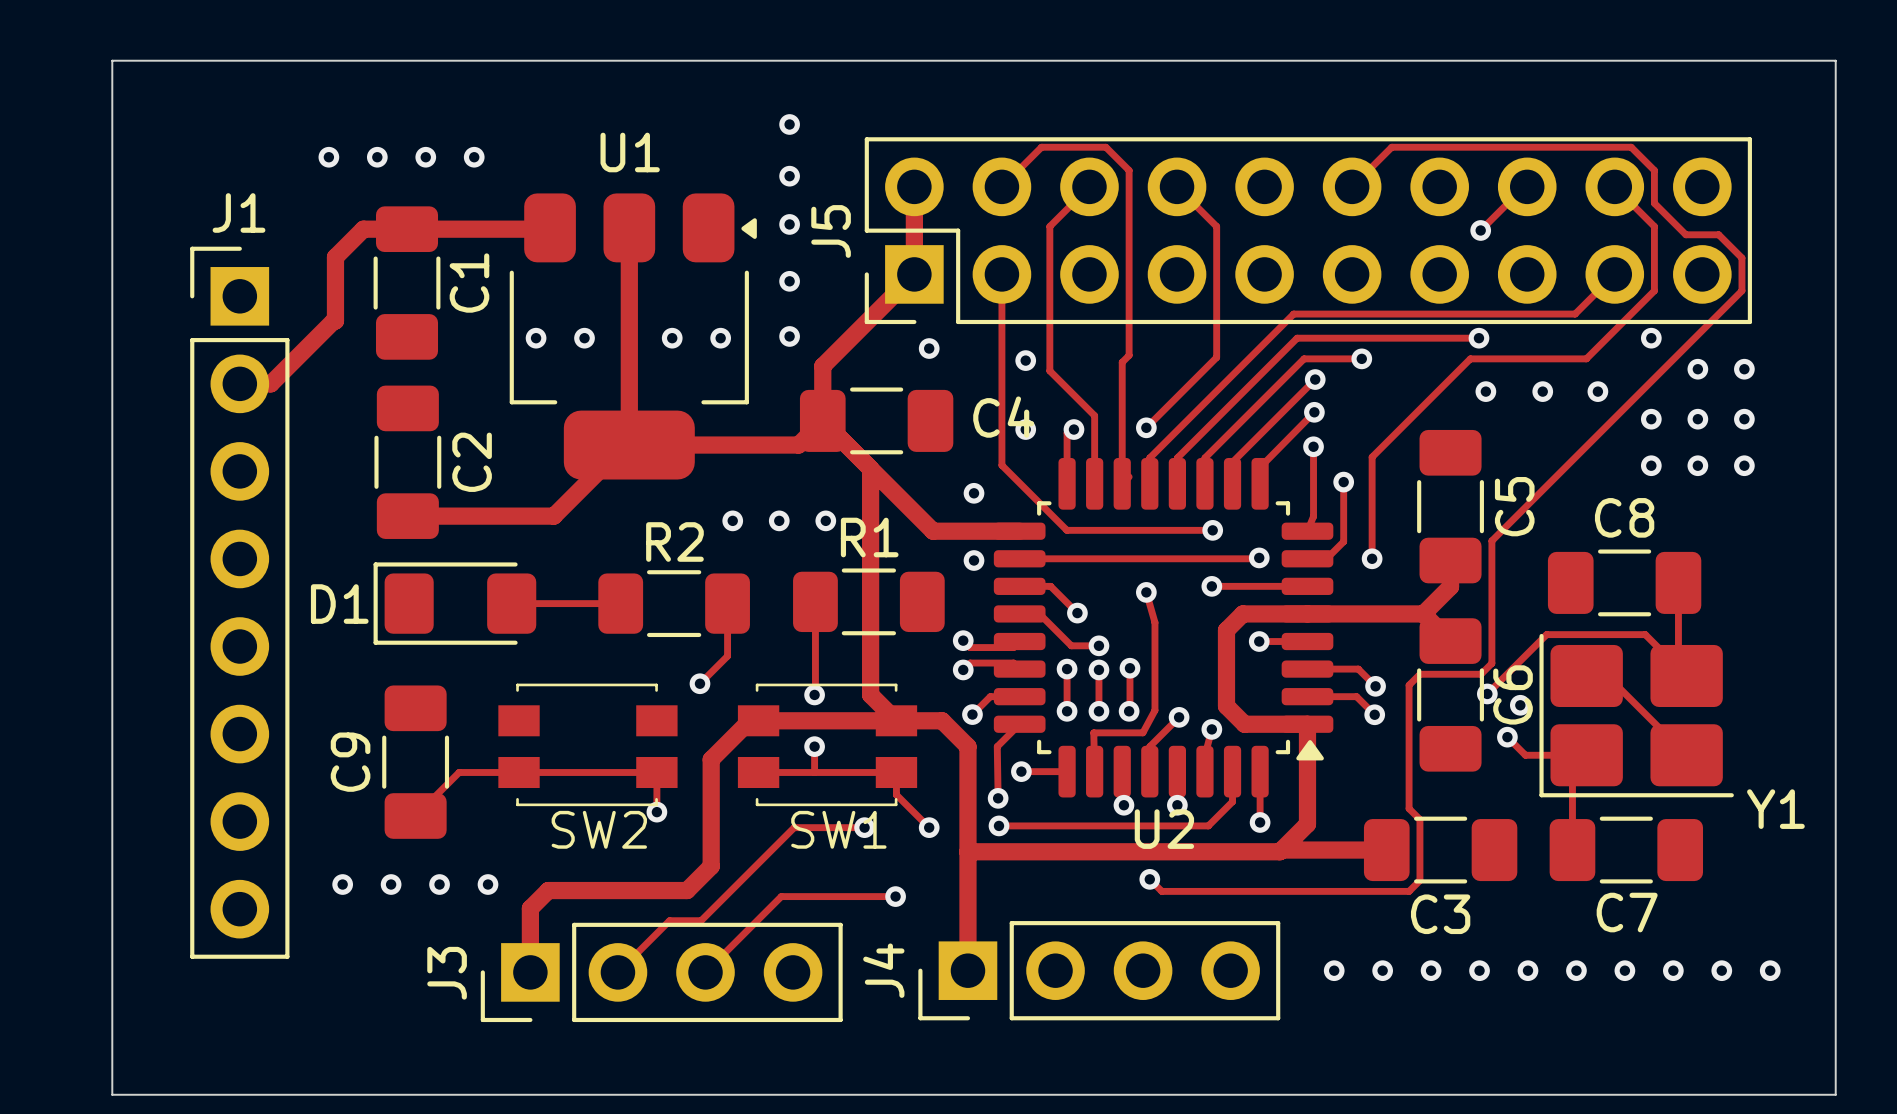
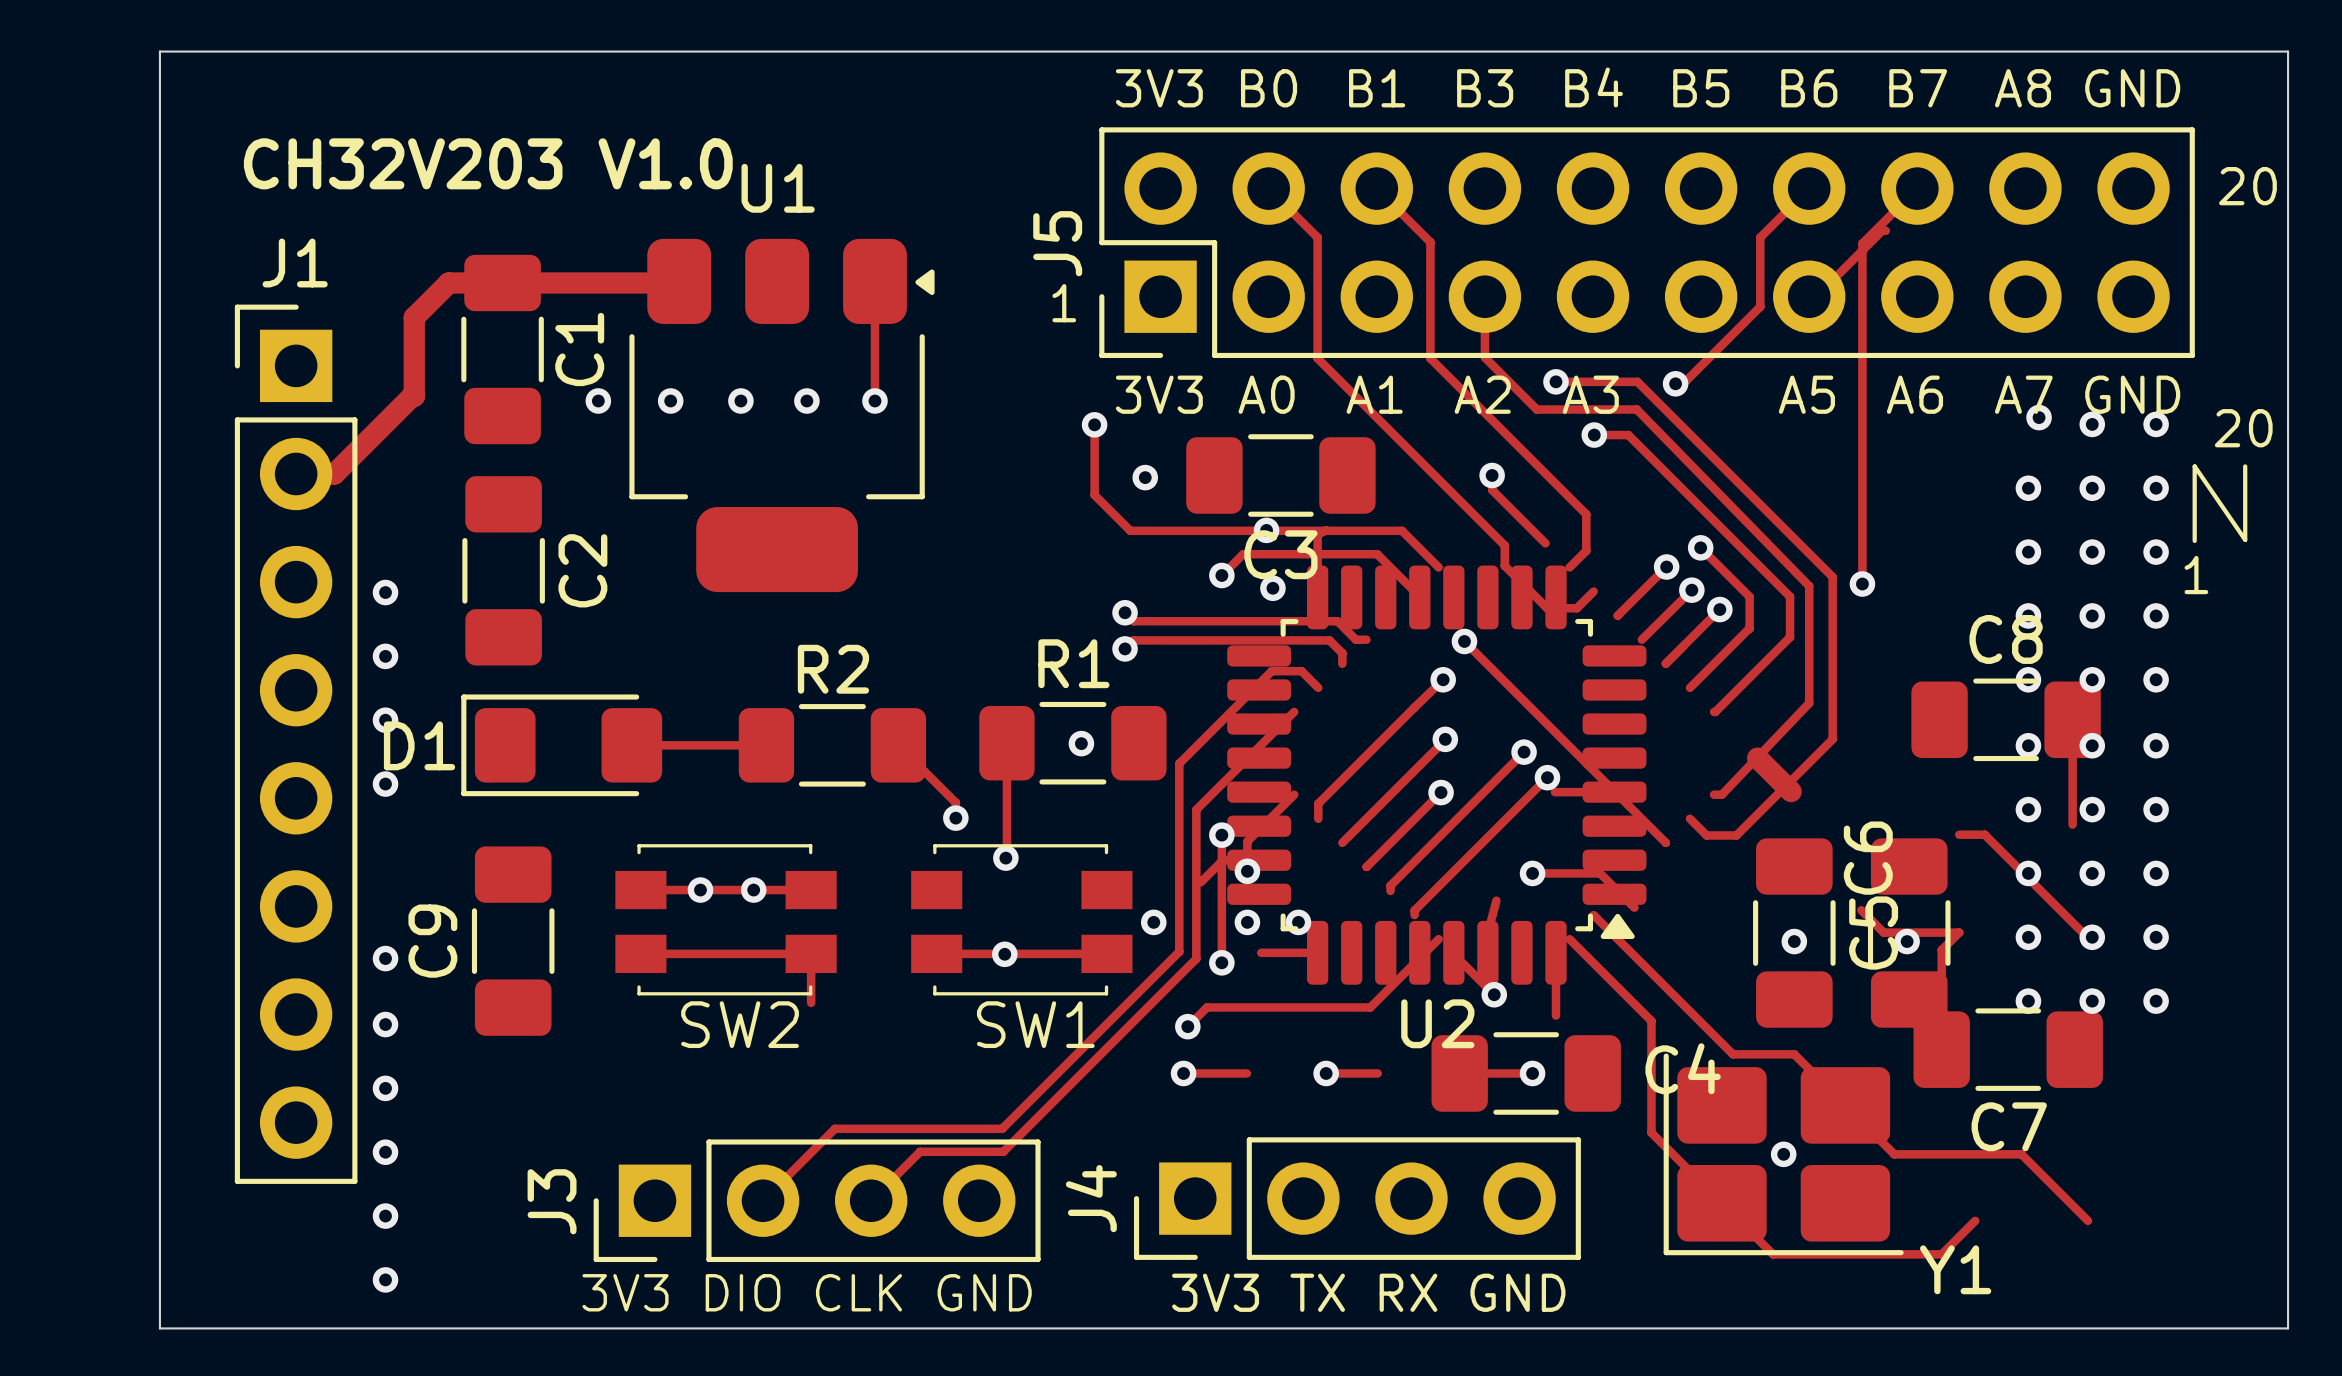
board edge: (112, 60) (1835, 60) (1835, 1094) (112, 1094) (112, 60) -> (159, 51) (2288, 51) (2288, 1328) (159, 1328) (159, 51)
text: none -> B4 (1594, 87)
text: none -> 3V3 (1159, 88)
text: none -> B0 (1269, 88)
text: none -> B1 (1377, 88)
text: none -> B3 (1485, 88)
text: none -> B5 (1701, 88)
text: none -> B6 (1809, 88)
text: none -> B7 (1918, 88)
text: none -> A8 (2023, 88)
text: none -> GND (2132, 88)
via: (789, 124) -> none
text: none -> CH32V203 V1.0 (488, 163)
text: none -> 20 (2247, 186)
track: none -> (1268, 188) (1317, 237) (1317, 358) (1504, 545) (1504, 565) (1547, 608) (1576, 608) (1593, 591)
track: none -> (1376, 188) (1430, 242) (1430, 358) (1586, 514) (1586, 550) (1569, 567)
track: none -> (1809, 188) (1760, 237) (1760, 306) (1683, 383) (1675, 383)
track: none -> (1917, 188) (1862, 243) (1862, 584)
via: (328, 157) -> none
via: (377, 157) -> none
via: (425, 157) -> none
via: (474, 157) -> none
via: (789, 176) -> none
track: (914, 186) (914, 274) (822, 366) (822, 420) -> none
track: (1001, 186) (1041, 147) (1105, 147) (1129, 170) (1129, 355) (1122, 362) (1122, 483) (1129, 476) -> none
track: (1089, 186) (1049, 226) (1049, 370) (1094, 415) (1094, 483) -> none
track: (1177, 186) (1216, 226) (1216, 357) (1146, 427) -> none
track: (1352, 186) (1391, 147) (1631, 147) (1654, 170) (1654, 203) (1685, 234) (1718, 234) (1741, 258) (1741, 290) (1491, 540) (1491, 663) (1481, 674) (1420, 674) (1409, 685) (1409, 808) (1419, 819) (1419, 880) (1409, 891) (1161, 891) (1149, 879) -> none
track: (1614, 186) (1654, 226) (1654, 290) (1586, 358) (1470, 358) (1372, 457) (1372, 558) -> none
via: (789, 224) -> none
track: (629, 227) (629, 445) -> none
track: none -> (874, 281) (874, 401)
J5 position: (1308, 230) -> (1647, 242)
via: (1480, 230) -> none
track: none -> (1484, 296) (1484, 357) (1536, 409) (1636, 409) (1809, 586) (1809, 703) (1721, 794) (1714, 794)
text: none -> 1 (1064, 303)
track: (1001, 274) (1001, 465) (1066, 530) (1212, 530) -> none
track: (1614, 274) (1575, 314) (1293, 314) (1149, 457) (1149, 483) -> none
via: (789, 281) -> none
track: none -> (1555, 381) (1637, 381) (1832, 576) (1832, 739) (1736, 835) (1706, 835) (1689, 818)
via: none -> (1555, 381)
via: none -> (1675, 383)
text: none -> 3V3 (1159, 394)
text: none -> A0 (1266, 394)
text: none -> A1 (1374, 394)
text: none -> A2 (1482, 394)
text: none -> A3 (1590, 394)
text: none -> A5 (1806, 394)
text: none -> A6 (1914, 394)
text: none -> A7 (2023, 394)
text: none -> GND (2132, 394)
via: none -> (598, 401)
via: (789, 336) -> none
via position: (536, 338) -> (670, 401)
via position: (584, 338) -> (740, 401)
via position: (672, 338) -> (806, 401)
via position: (720, 338) -> (874, 401)
track: (1478, 338) (1297, 338) (1177, 457) (1177, 483) -> none
via: (1478, 338) -> none
via: none -> (2092, 424)
via: none -> (2156, 424)
track: none -> (1094, 424) (1094, 495) (1130, 530) (1402, 530) (1438, 567)
via: none -> (1094, 424)
text: none -> 20 (2243, 428)
via: (929, 348) -> none
track: none -> (1594, 435) (1628, 435) (1790, 596) (1790, 637) (1714, 711)
via: none -> (1594, 435)
track: (1361, 358) (1304, 358) (1204, 457) (1204, 483) -> none
via: (1361, 358) -> none
via: (1025, 360) -> none
via: (1697, 369) -> none
via: (1744, 369) -> none
line: none -> (2245, 466) (2245, 539) (2194, 466) (2194, 540)
track: (1315, 379) (1232, 462) (1232, 483) -> none
via: (1315, 379) -> none
track: none -> (1492, 475) (1492, 490) (1545, 543)
via: none -> (1492, 475)
via: none -> (1145, 477)
via: (1485, 391) -> none
via: (1542, 391) -> none
via: (1597, 391) -> none
via: none -> (2028, 488)
via: none -> (2092, 488)
via: none -> (2156, 488)
track: (1314, 412) (1260, 467) (1260, 483) -> none
via: (1314, 412) -> none
via: (1651, 419) -> none
via: (1697, 419) -> none
via: (1744, 419) -> none
track: (822, 420) (933, 531) (1019, 531) -> none
track: (822, 420) (798, 445) (625, 445) (553, 516) (407, 516) -> none
C4 position: (876, 420) -> (1526, 1073)
via: (1146, 427) -> none
via: (1073, 429) -> none
track: none -> (1700, 547) (1749, 596) (1749, 628)
via: none -> (1700, 547)
track: (1313, 446) (1313, 516) (1307, 531) -> none
via: (1313, 446) -> none
track: none -> (1666, 566) (1617, 615)
via: none -> (1666, 566)
via position: (1651, 465) -> (2028, 552)
via position: (1697, 465) -> (2092, 552)
via position: (1744, 465) -> (2156, 552)
text: none -> 1 (2196, 575)
track: none -> (1221, 575) (1243, 554) (1377, 554) (1414, 591)
via: none -> (1221, 575)
track: (870, 468) (870, 694) (896, 720) -> none
via: none -> (1862, 584)
via: none -> (1272, 588)
track: none -> (1691, 590) (1641, 639)
via: none -> (1691, 590)
via: none -> (385, 592)
track: (1343, 482) (1343, 541) (1326, 558) (1307, 558) -> none
via: (1343, 482) -> none
via: (974, 493) -> none
track: none -> (1719, 609) (1665, 663) (1682, 647)
via: none -> (1719, 609)
track: none -> (1125, 612) (1133, 621) (1337, 621) (1355, 639) (1366, 639)
via: none -> (1125, 612)
via: none -> (2028, 615)
via: none -> (2092, 615)
via: none -> (2156, 615)
C5 position: (1450, 506) -> (1794, 933)
track: none -> (1749, 628) (1689, 687)
track: none -> (1464, 641) (1665, 842)
via: none -> (1464, 641)
via: (732, 520) -> none
via: (779, 520) -> none
via: (825, 520) -> none
track: none -> (1125, 648) (1133, 640) (1329, 640) (1342, 653) (1342, 663)
via: none -> (1125, 648)
via: (1212, 530) -> none
via: none -> (385, 656)
track: none -> (1443, 679) (1318, 803) (1318, 818)
via: none -> (1443, 679)
via: none -> (2028, 679)
via: none -> (2092, 679)
via: none -> (2156, 679)
track: (1259, 557) (1019, 558) -> none
via: (1259, 557) -> none
via: (1372, 558) -> none
via: (974, 560) -> none
track: (1450, 560) (1450, 586) (1423, 613) (1242, 613) (1226, 630) (1226, 706) (1244, 724) (1307, 724) (1307, 824) (1279, 851) (967, 851) -> none
via: none -> (385, 720)
track: (1019, 586) (1050, 586) (1077, 613) -> none
track: (1211, 586) (1307, 586) -> none
via: (1211, 586) -> none
track: (1146, 592) (1154, 622) (1154, 710) (1142, 732) (1093, 732) (1094, 771) -> none
via: (1146, 592) -> none
via: none -> (1445, 739)
track: none -> (1445, 739) (1342, 842)
via: none -> (1081, 743)
track: (727, 603) (727, 656) (699, 683) -> (898, 745) (955, 802) (955, 818)
via: none -> (2028, 745)
via: none -> (2092, 745)
via: none -> (2156, 745)
track: none -> (1524, 752) (1390, 885) (1390, 891)
via: none -> (1524, 752)
track: (1019, 613) (1039, 613) (1071, 645) (1098, 645) -> none
via: (1077, 613) -> none
track: none -> (1547, 777) (1414, 910) (1414, 915)
via: none -> (385, 784)
track: (963, 640) (970, 647) (1013, 647) (1019, 641) -> none
via: (963, 640) -> none
track: none -> (1441, 792) (1366, 866)
via: none -> (1441, 792)
via position: (1259, 641) -> (1547, 777)
track: none -> (1294, 794) (1247, 841) (1247, 871)
via: (1098, 645) -> none
via: none -> (2028, 809)
via: none -> (2092, 809)
via: none -> (2156, 809)
via: none -> (955, 818)
track: (1129, 668) (1129, 711) -> none
via: (1129, 668) -> none
via: (963, 669) -> none
track: (1019, 669) (1013, 663) (970, 663) (963, 669) -> none
track: (1067, 669) (1067, 711) -> none
via: (1067, 669) -> none
track: (1098, 669) (1098, 711) -> none
via: (1098, 669) -> none
track: (1307, 669) (1358, 669) (1375, 686) -> none
track: (1686, 675) (1645, 634) (1546, 634) (1487, 693) -> none
track: none -> (1221, 835) (1221, 962)
via: none -> (1221, 835)
via: (699, 683) -> none
via: (1375, 686) -> none
via: (1487, 693) -> none
C6 position: (1450, 694) -> (1909, 933)
track: (1307, 696) (1356, 696) (1374, 714) -> none
via: none -> (1247, 871)
via: (1520, 705) -> none
track: none -> (1532, 873) (1600, 873) (1634, 907)
via: none -> (1532, 873)
via: none -> (2028, 873)
via: none -> (2092, 873)
via: none -> (2156, 873)
via: (1067, 711) -> none
via: (1098, 711) -> none
via: (1129, 711) -> none
via: (972, 714) -> none
via: (1374, 714) -> none
Y1 position: (1636, 715) -> (1783, 1154)
track: (1179, 717) (1149, 746) (1149, 771) -> none
via: (1179, 717) -> none
track: none -> (640, 890) (811, 890)
via: none -> (700, 890)
via: none -> (753, 890)
track: (1019, 724) (997, 746) (998, 798) -> none
via: (1211, 729) -> none
via: (1507, 737) -> none
track: none -> (1593, 915) (1732, 1054) (1794, 1054) (1894, 1154) (2021, 1154) (2088, 1220)
track: (814, 746) (814, 772) -> none
via position: (814, 746) -> (1004, 954)
via: none -> (1153, 922)
via: none -> (1247, 922)
via: none -> (1298, 922)
via: none -> (2028, 937)
via: none -> (2092, 937)
via: none -> (2156, 937)
track: none -> (1438, 939) (1370, 1007) (1207, 1007) (1187, 1026)
track: none -> (1569, 939) (1651, 1021) (1651, 1132) (1773, 1254) (1941, 1254) (1975, 1220)
via: none -> (1794, 941)
via: none -> (1907, 941)
via: (1021, 771) -> none
track: (1232, 771) (1232, 801) (1208, 825) (999, 825) -> none
track: (519, 772) (459, 772) (415, 816) -> none
track: (896, 772) (896, 794) (929, 827) -> none
via: none -> (385, 958)
track: none -> (1462, 963) (1494, 994)
via position: (998, 798) -> (1221, 962)
via: (1123, 805) -> none
via: (1177, 805) -> none
via: none -> (1494, 994)
via: none -> (2028, 1001)
via: none -> (2092, 1001)
via: none -> (2156, 1001)
via: (656, 812) -> none
via: (1260, 822) -> none
via: (999, 825) -> none
track: (864, 827) (794, 827) (701, 920) (669, 920) -> (1318, 687) (1301, 671) (1271, 671) (1179, 763) (1179, 951) (1002, 1128) (834, 1128) (826, 1136)
via: (864, 827) -> none
via: (929, 827) -> none
via: none -> (385, 1024)
via: none -> (1187, 1026)
track: (1281, 850) (1386, 850) -> none
C3 position: (1440, 850) -> (1280, 475)
track: none -> (1183, 1073) (1246, 1073)
via: none -> (1183, 1073)
track: none -> (1326, 1073) (1377, 1073)
via: none -> (1326, 1073)
track: none -> (1466, 1073) (1532, 1073)
via: none -> (1532, 1073)
via: (1149, 879) -> none
via: none -> (385, 1088)
via: (342, 884) -> none
via: (391, 884) -> none
via: (439, 884) -> none
via: (488, 884) -> none
track: (895, 896) (781, 896) (745, 932) -> (1294, 711) (1196, 809) (1196, 958) (1003, 1151) (920, 1151)
via: (895, 896) -> none
via: none -> (385, 1152)
via: none -> (1783, 1154)
track: (967, 970) (967, 746) (942, 720) (749, 720) (711, 759) (711, 866) (687, 890) (548, 890) (530, 908) (530, 972) -> none
via: (1334, 970) -> none
via: (1382, 970) -> none
via: (1431, 970) -> none
via: (1479, 970) -> none
via: (1528, 970) -> none
via: (1576, 970) -> none
via: (1624, 970) -> none
via: (1673, 970) -> none
via: (1721, 970) -> none
via: (1770, 970) -> none
via: none -> (385, 1216)
via: none -> (385, 1279)
text: none -> 3V3 DIO CLK GND (807, 1292)
text: none -> 3V3 TX RX GND (1368, 1292)

